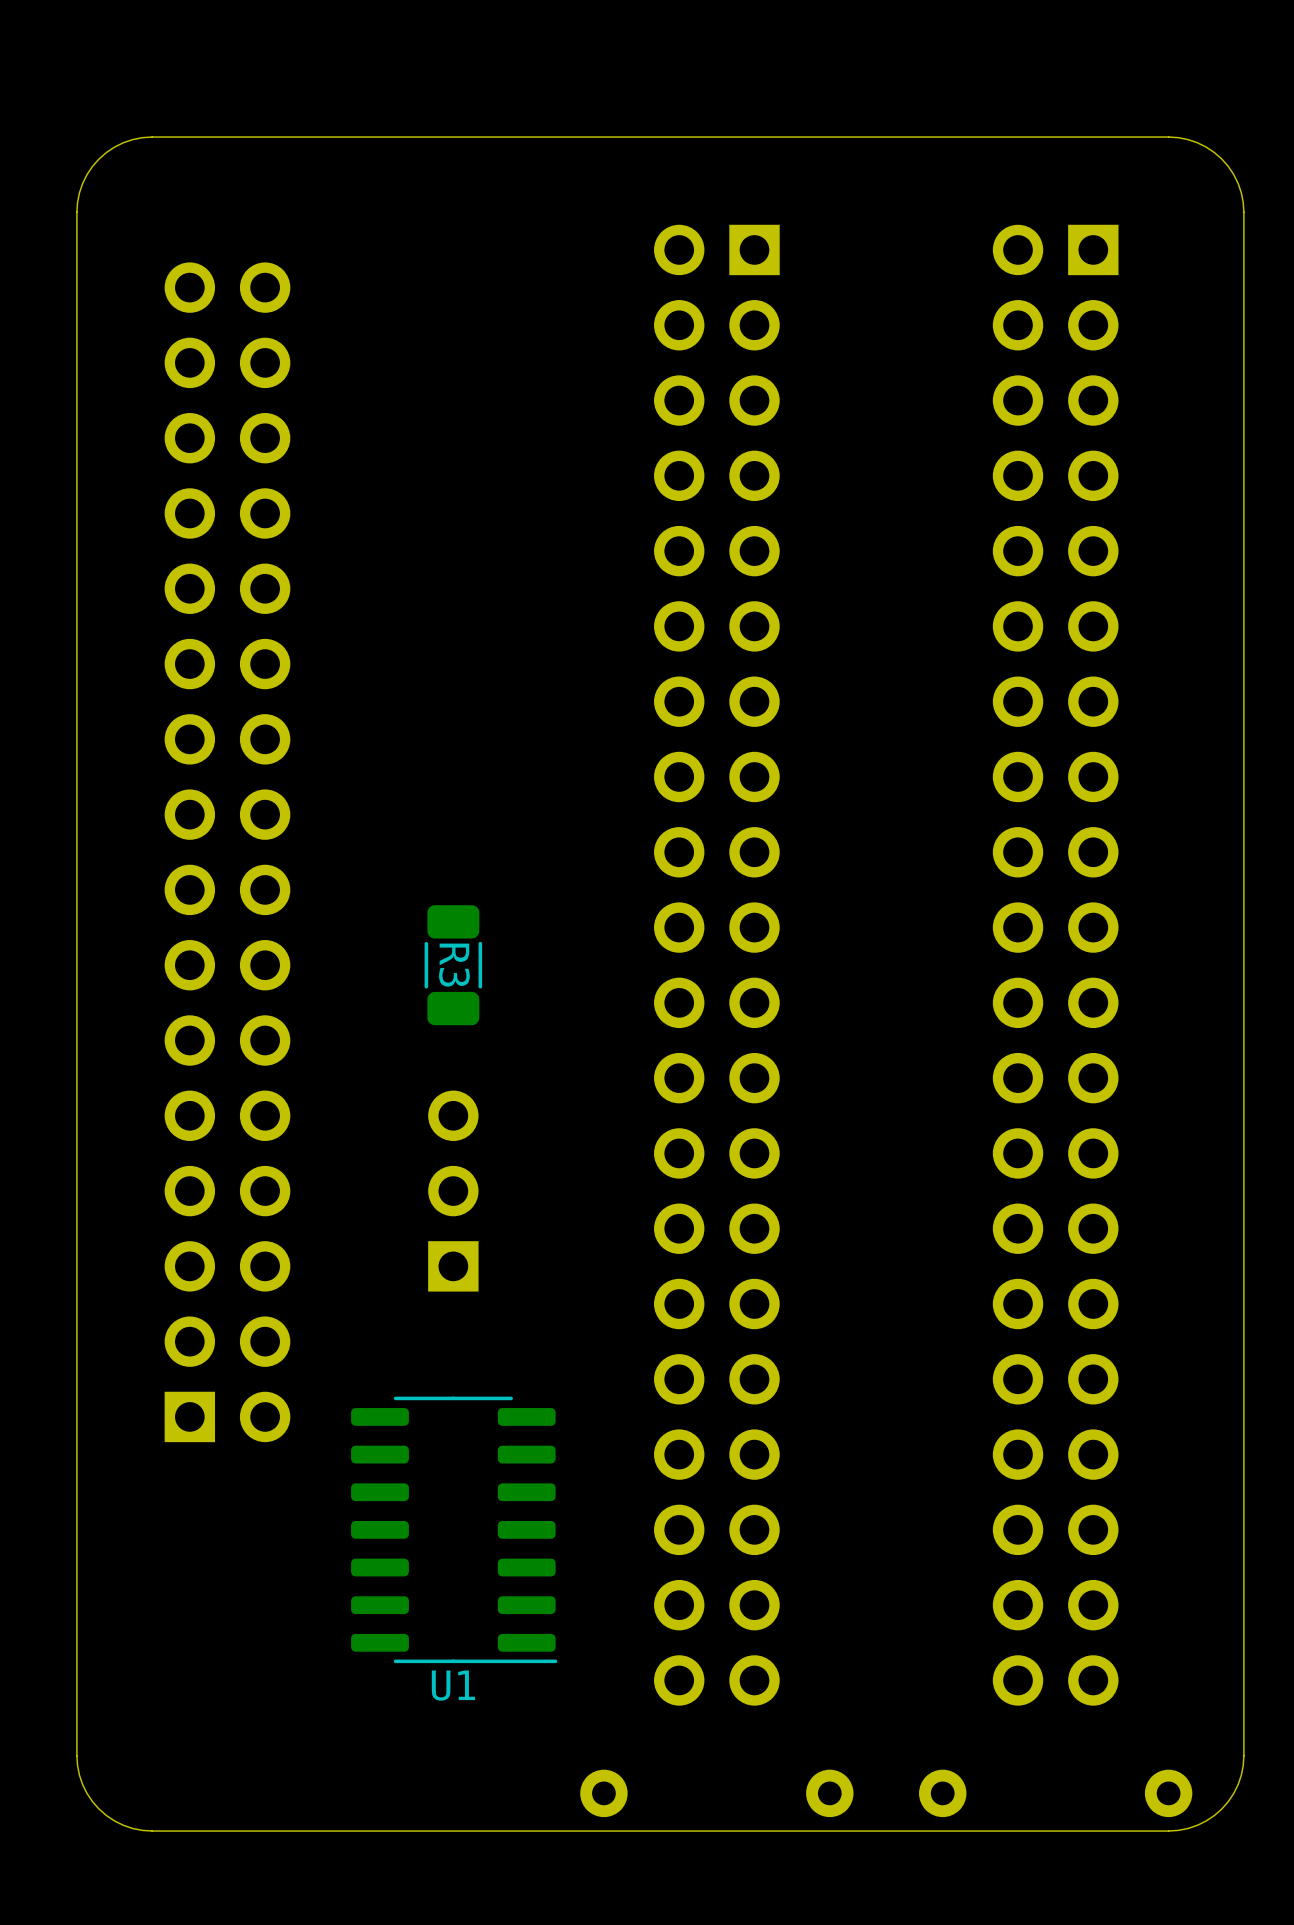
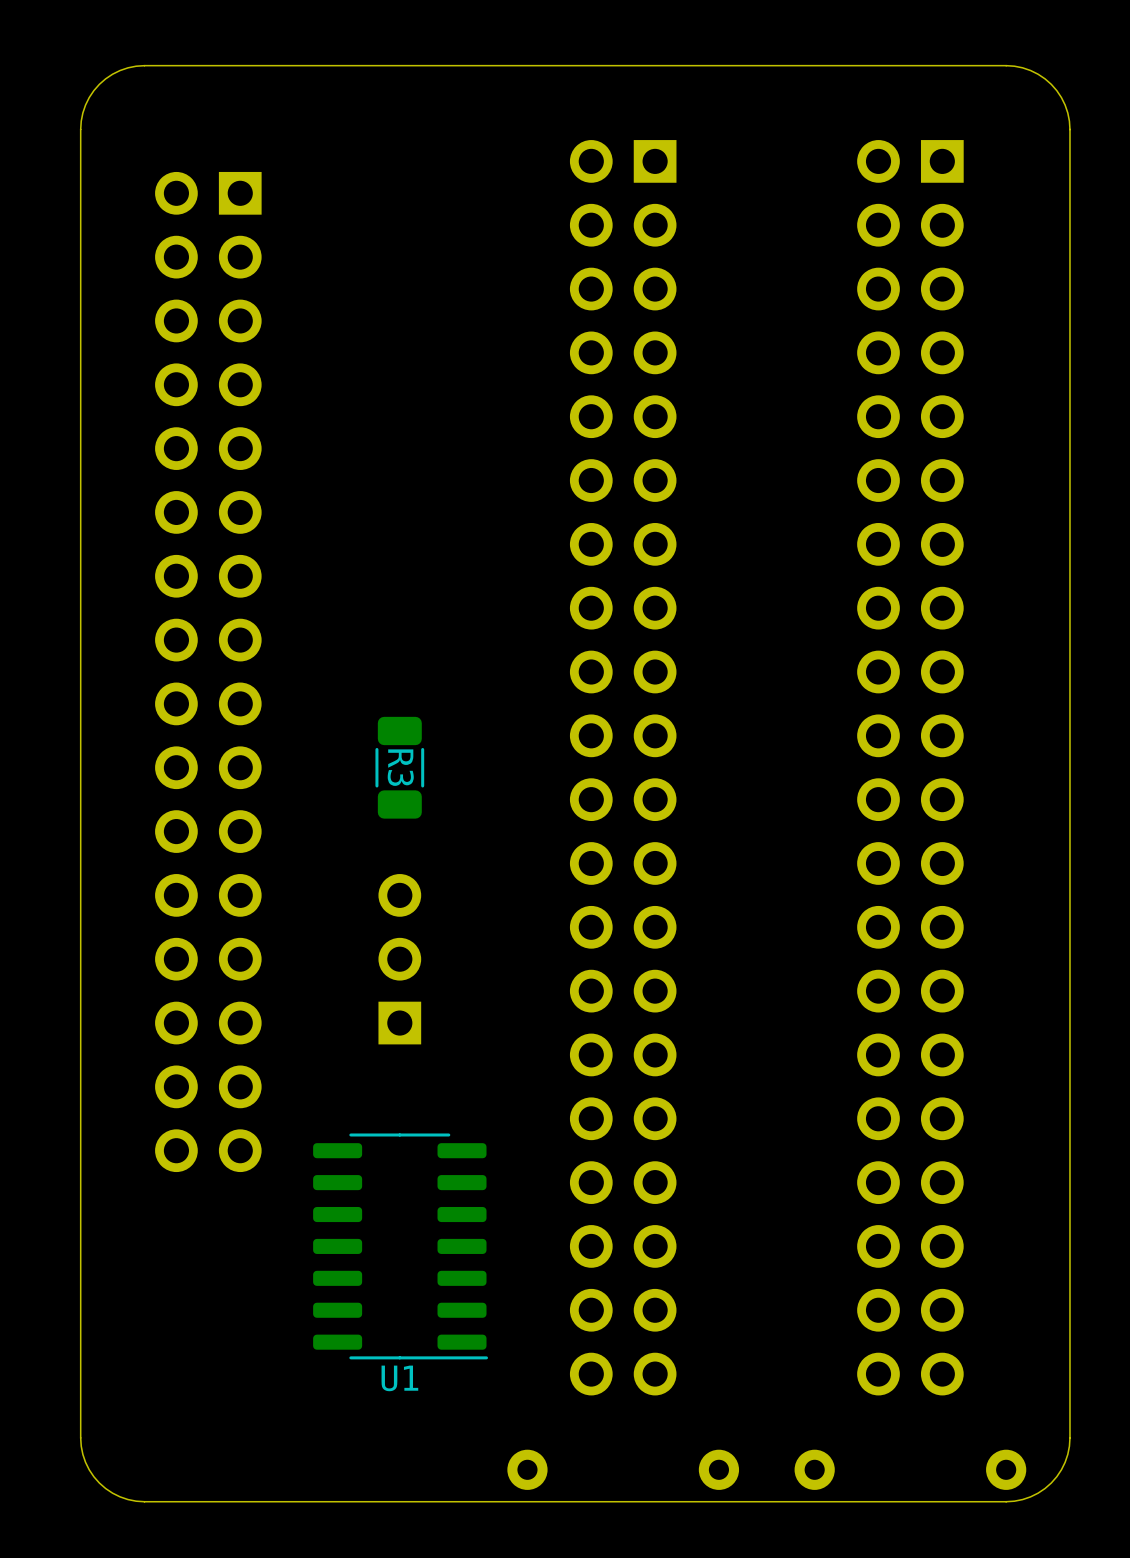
part rotation: 0° (227, 852) -> 180° (208, 672)

